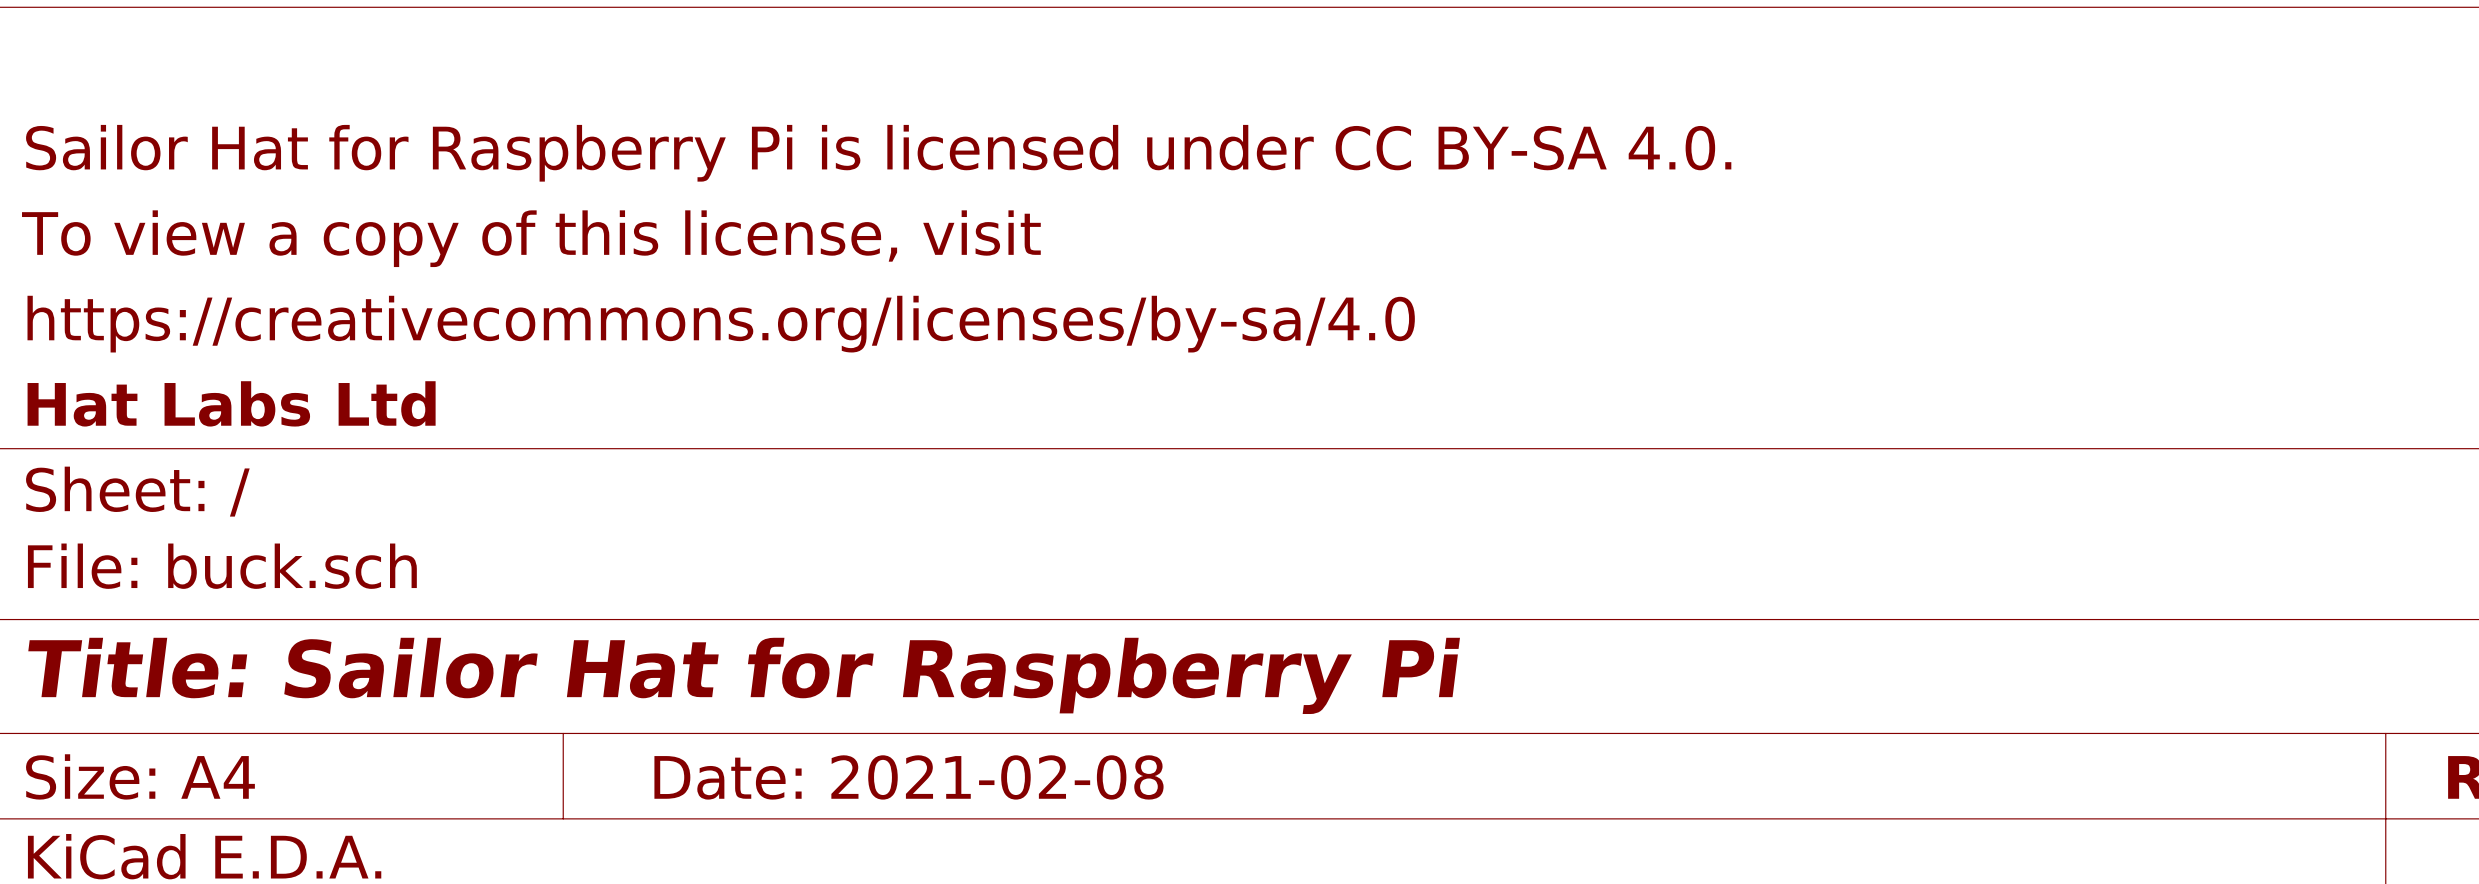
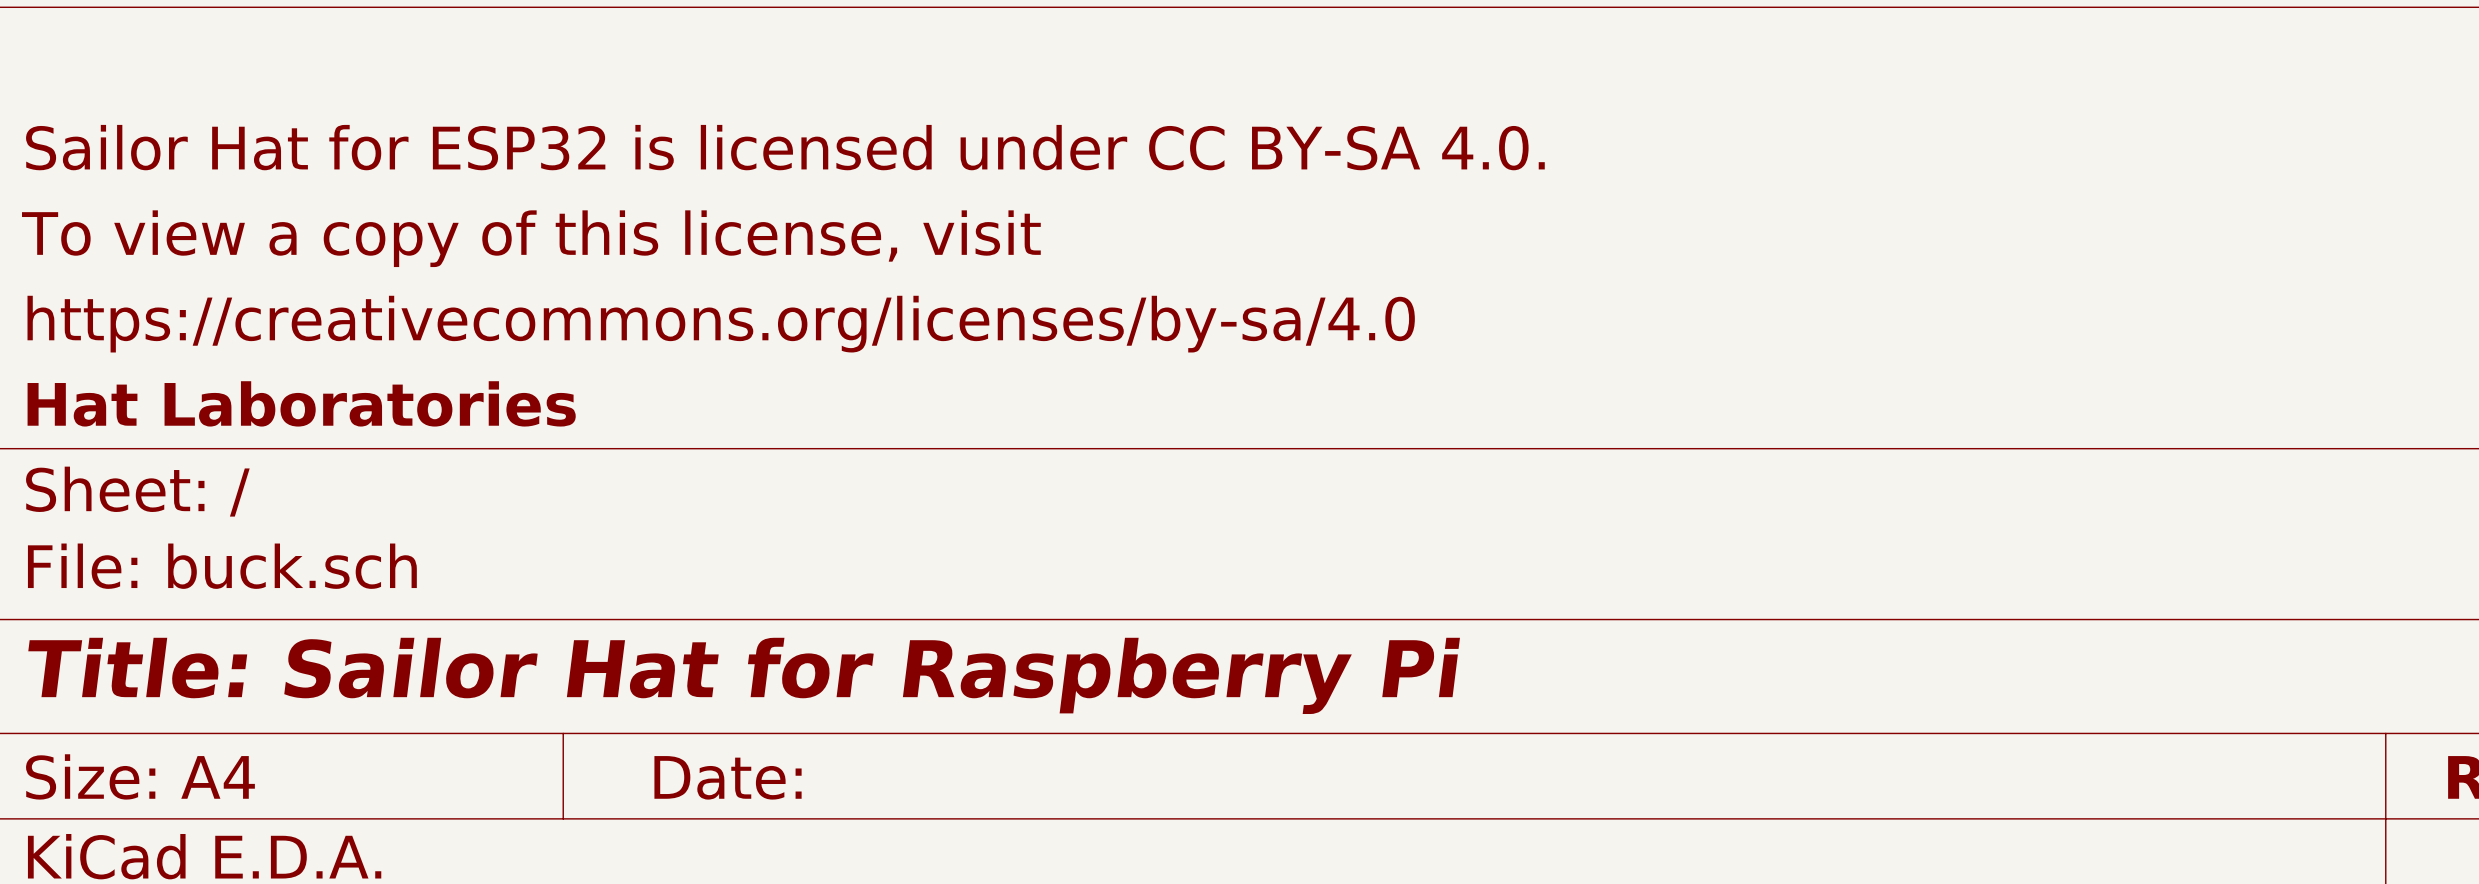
title block: Sailor Hat for Raspberry Pi is licensed under CC BY-SA 4.0. (878, 153) -> Sailor Hat for ESP32 is licensed under CC BY-SA 4.0. (785, 147)
title block: Hat Labs Ltd (231, 403) -> Hat Laboratories (301, 403)
title block: Date: 2021-02-08 (908, 777) -> Date: (728, 777)

